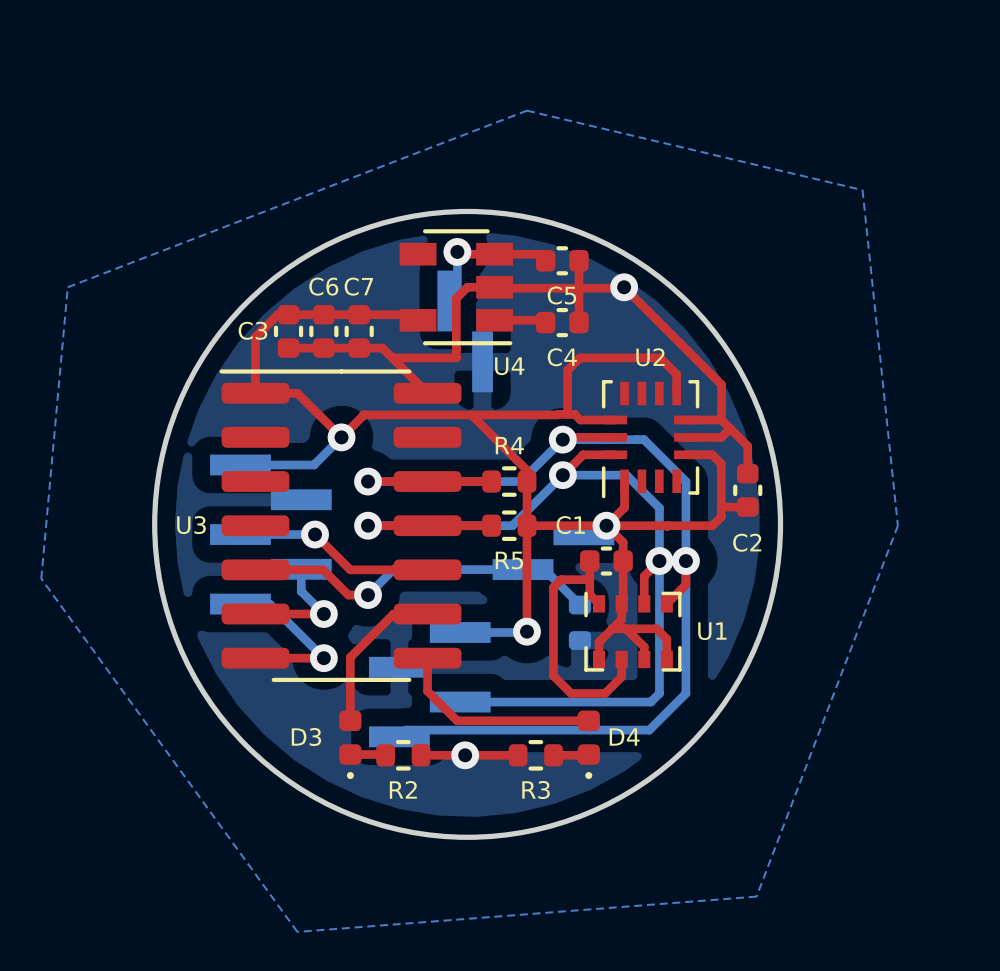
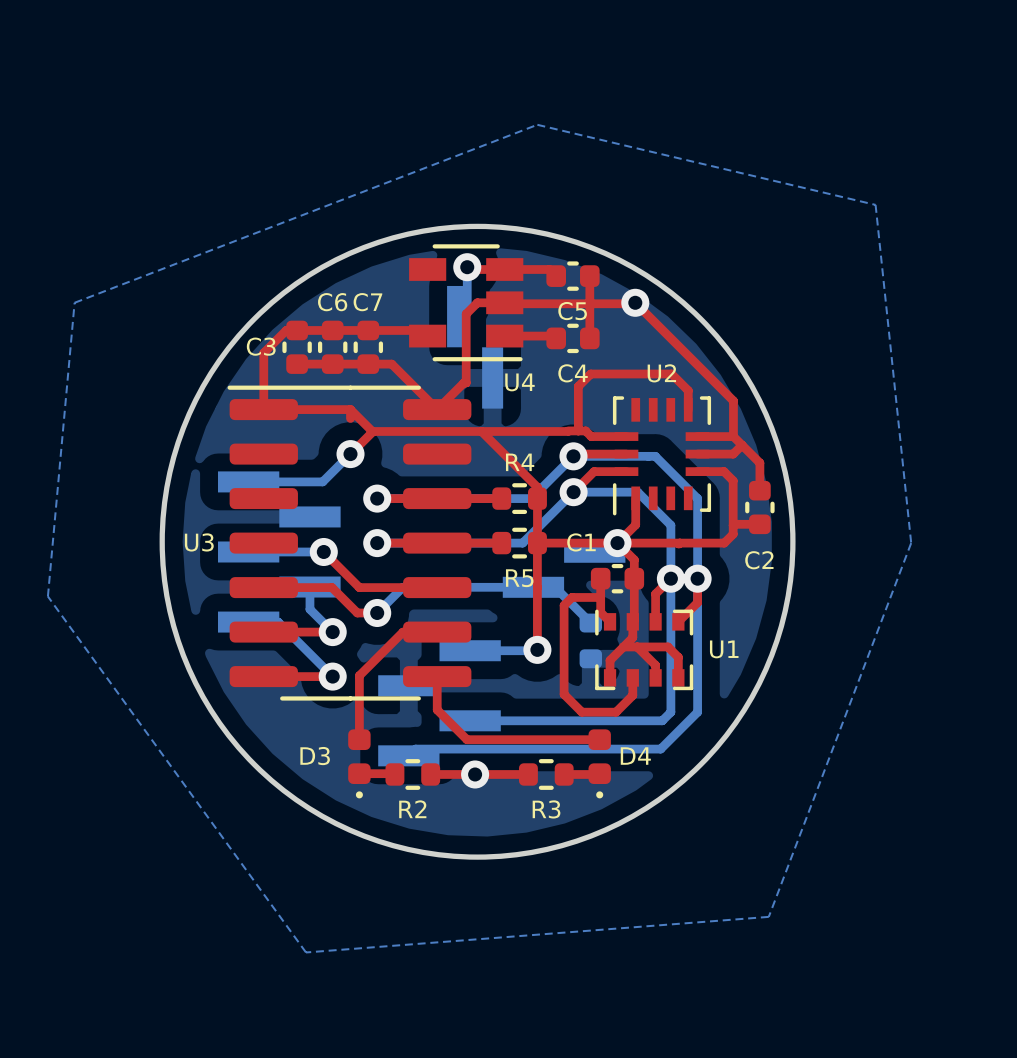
top track: (456, 357) (393, 359) -> (466, 373) (466, 382) (463, 382) (437, 409)
top track: (297, 393) (341, 437) -> (306, 409) (350, 409)
top track: none -> (350, 409) (372, 431)
top track: none -> (350, 409) (350, 418)

